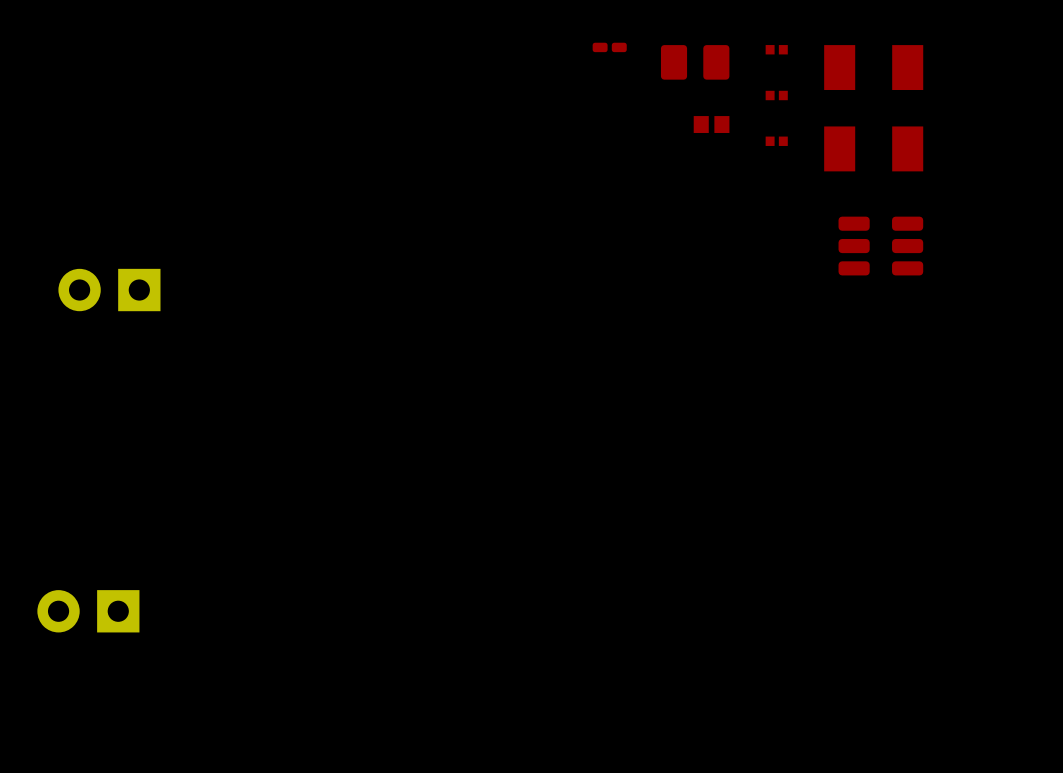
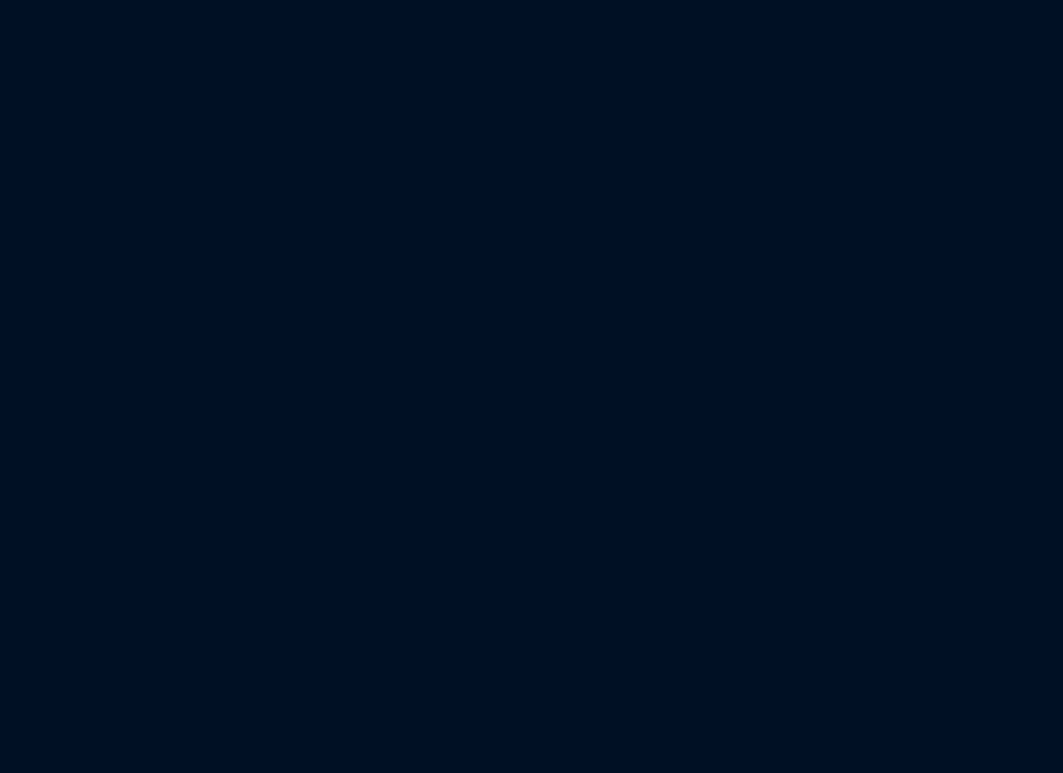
part: (609, 47) -> none
part: (776, 49) -> none
part: (695, 62) -> none
part: (873, 67) -> none
part: (776, 95) -> none
part: (711, 124) -> none
part: (776, 141) -> none
part: (873, 148) -> none
part: (880, 246) -> none
part: (109, 290) -> none
part: (88, 611) -> none

